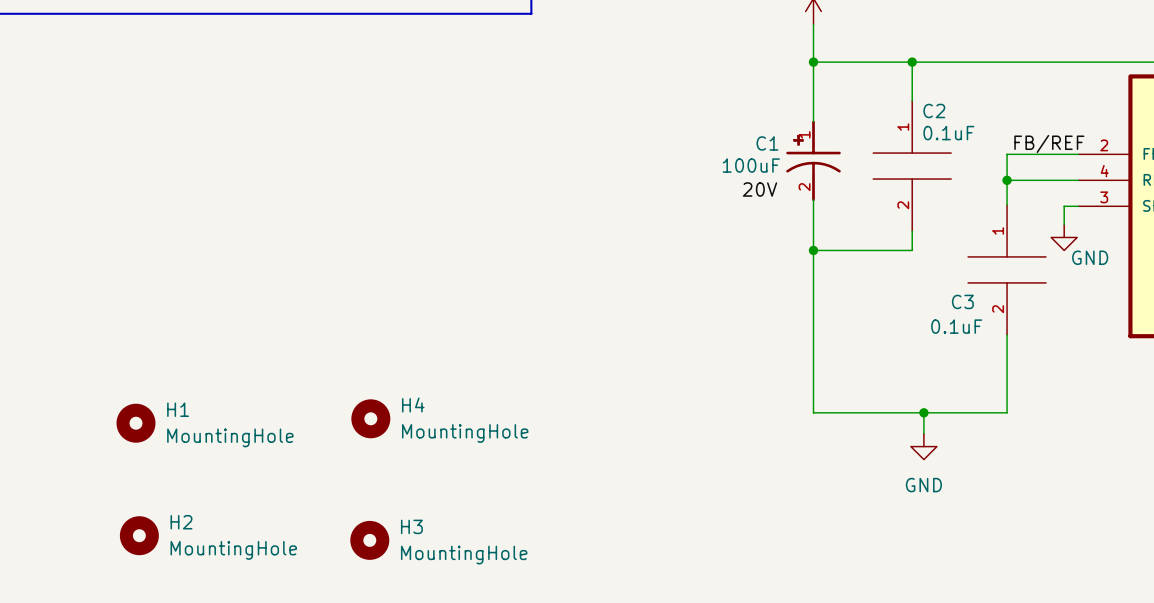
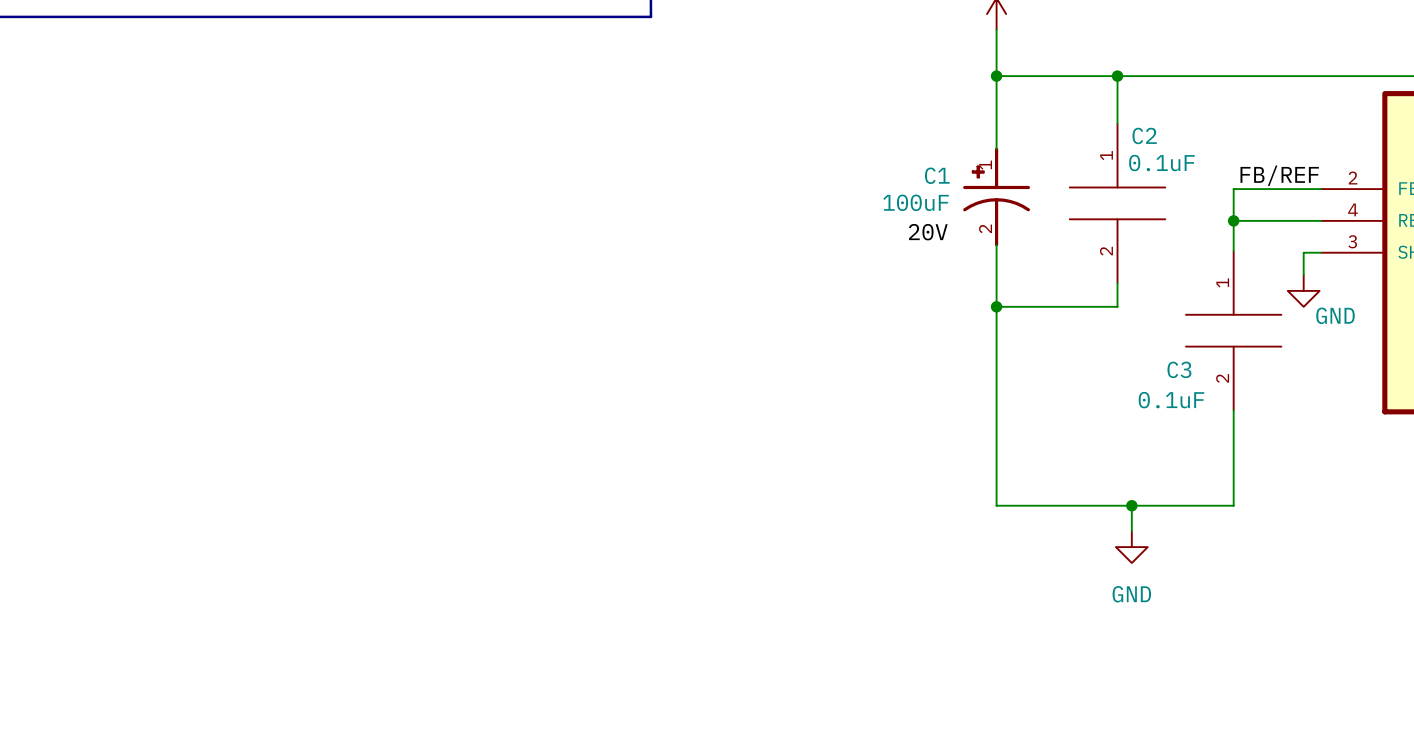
H4: MountingHole (370, 418) -> none
H1: MountingHole (135, 423) -> none
H2: MountingHole (139, 535) -> none
H3: MountingHole (369, 540) -> none

